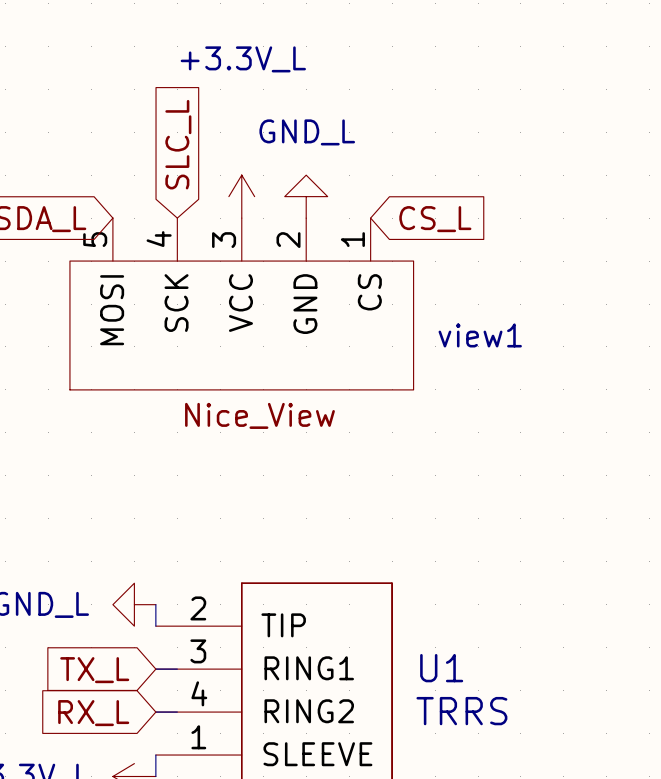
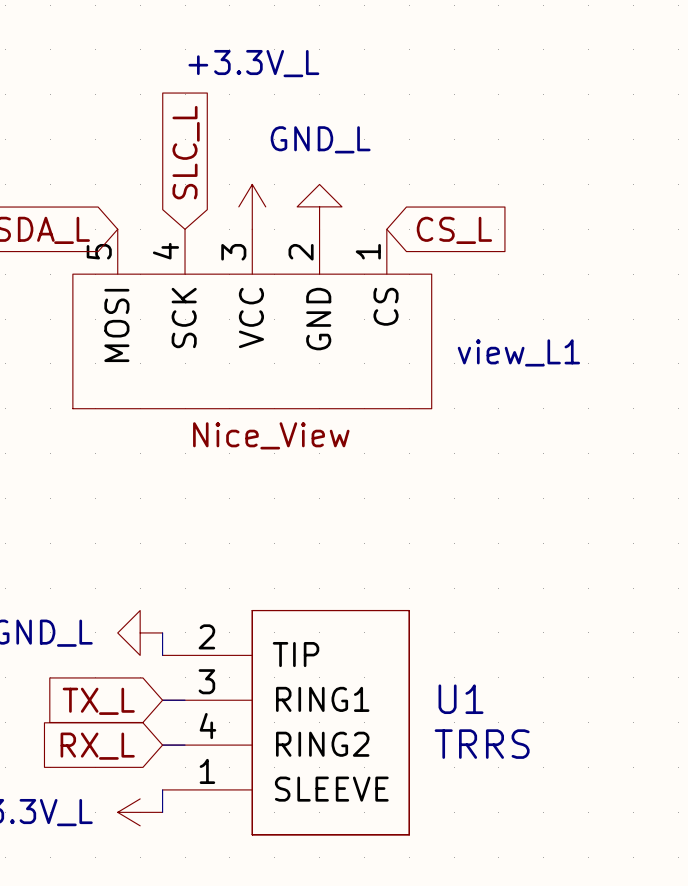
view1 name: view1 (480, 335) -> view_L1 (518, 352)

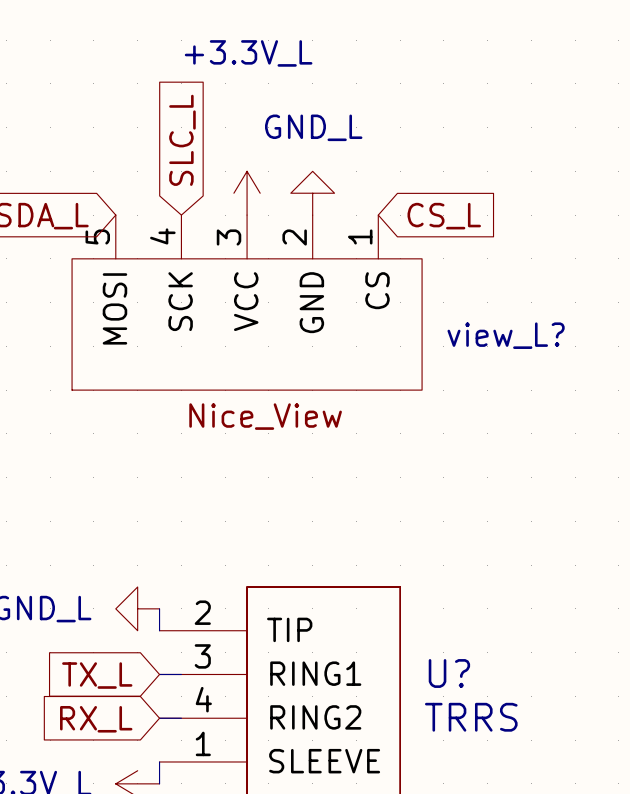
view_L1 name: view_L1 (518, 352) -> view_L? (506, 335)
U1 name: U1 (461, 699) -> U? (449, 673)

